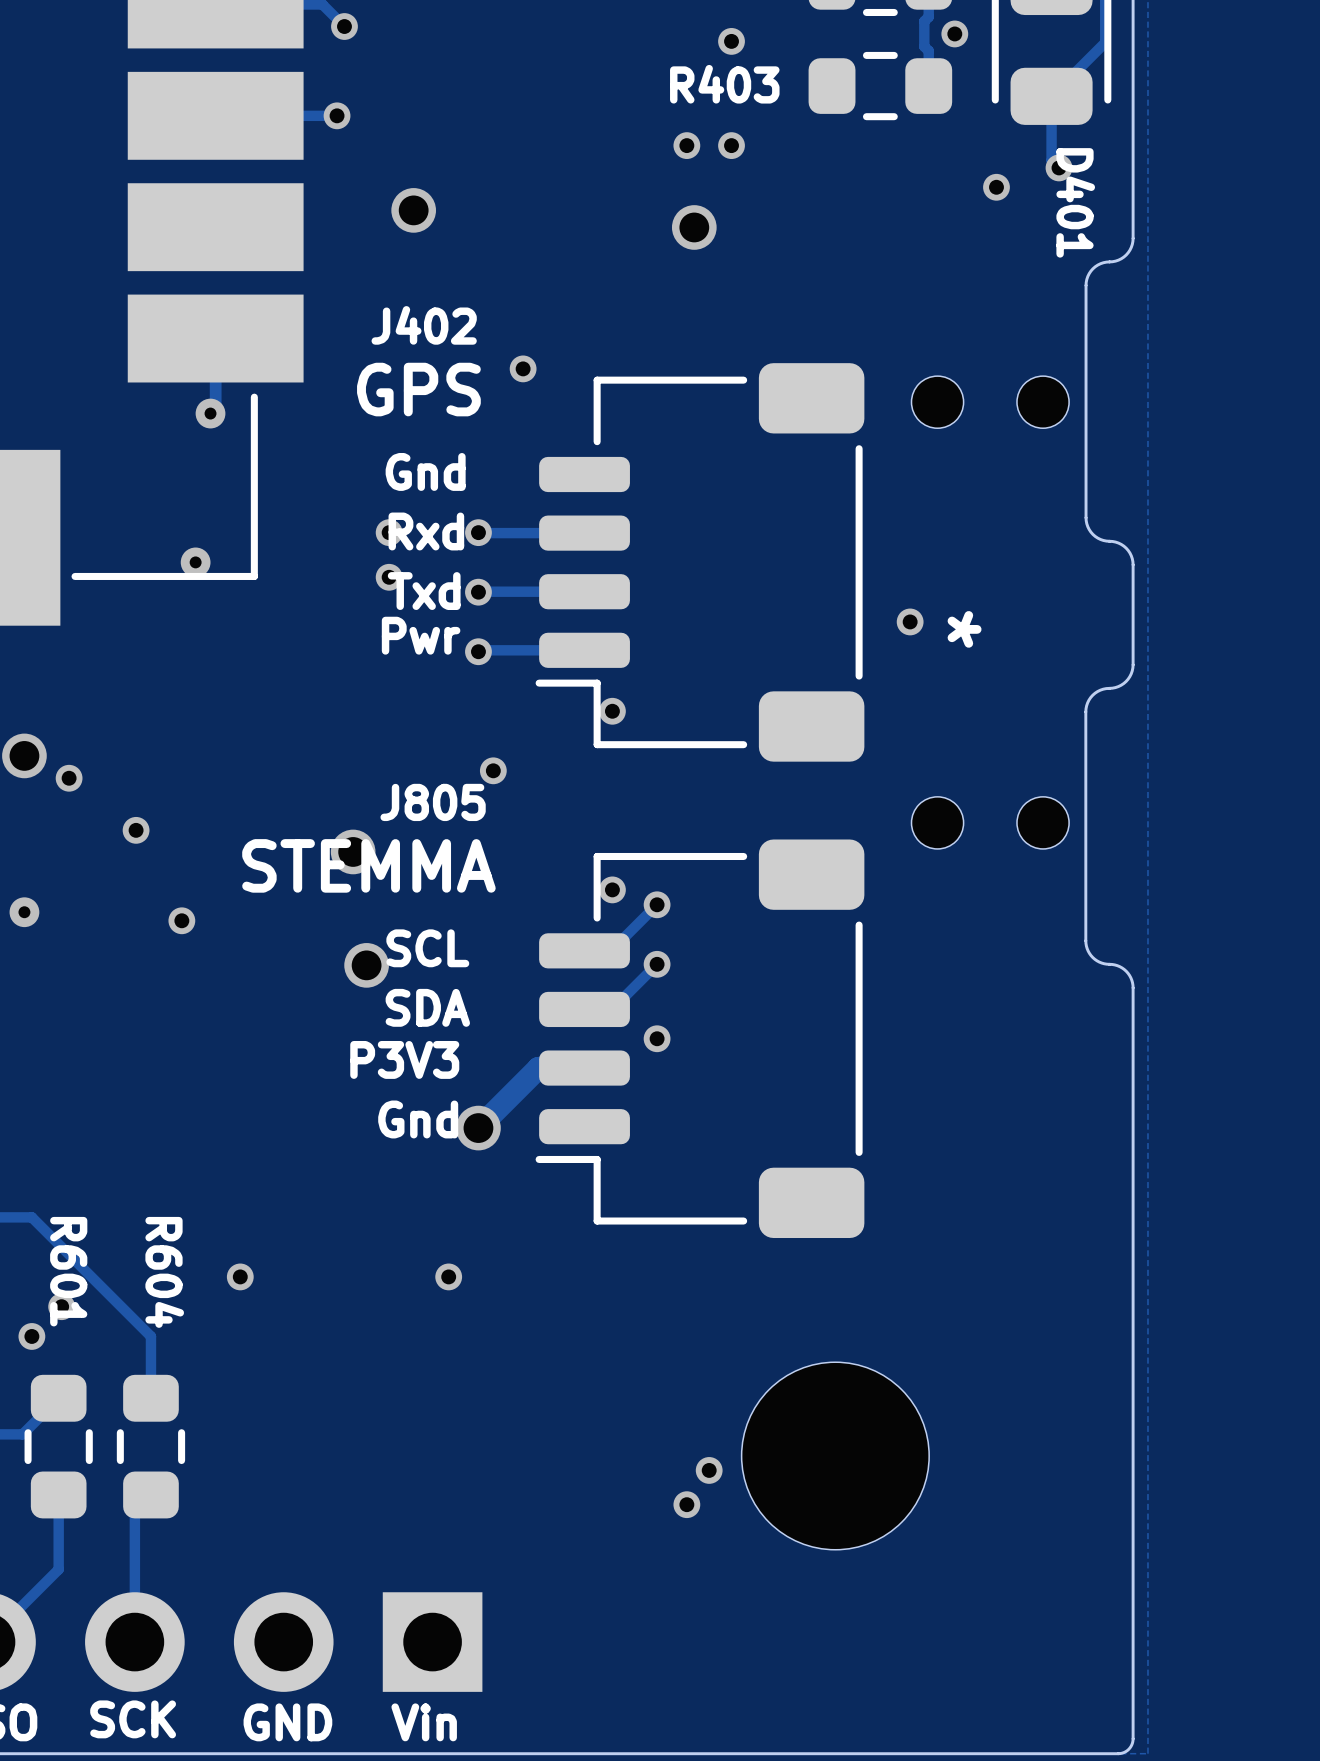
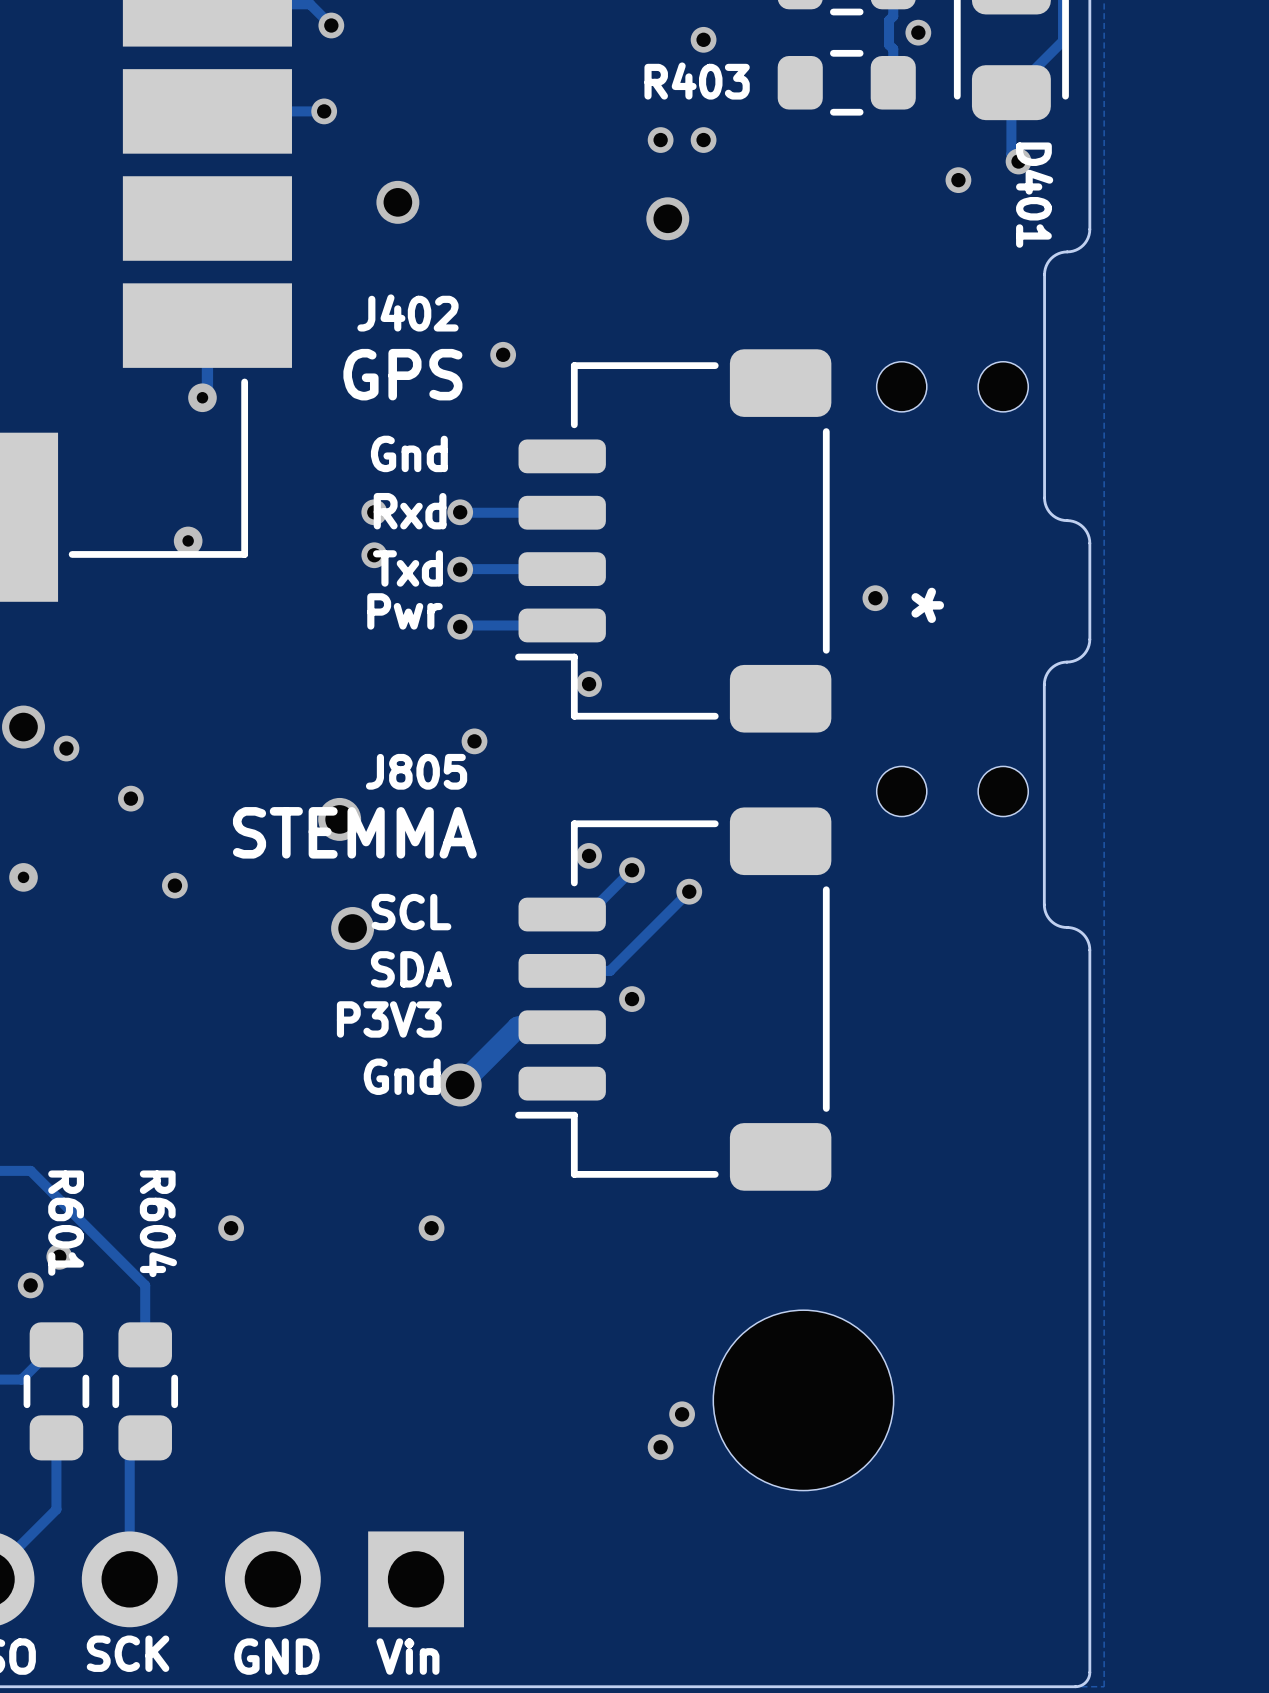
track: (657, 964) (611, 1009) -> (689, 891) (610, 970) (588, 970)
via position: (657, 964) -> (689, 891)

